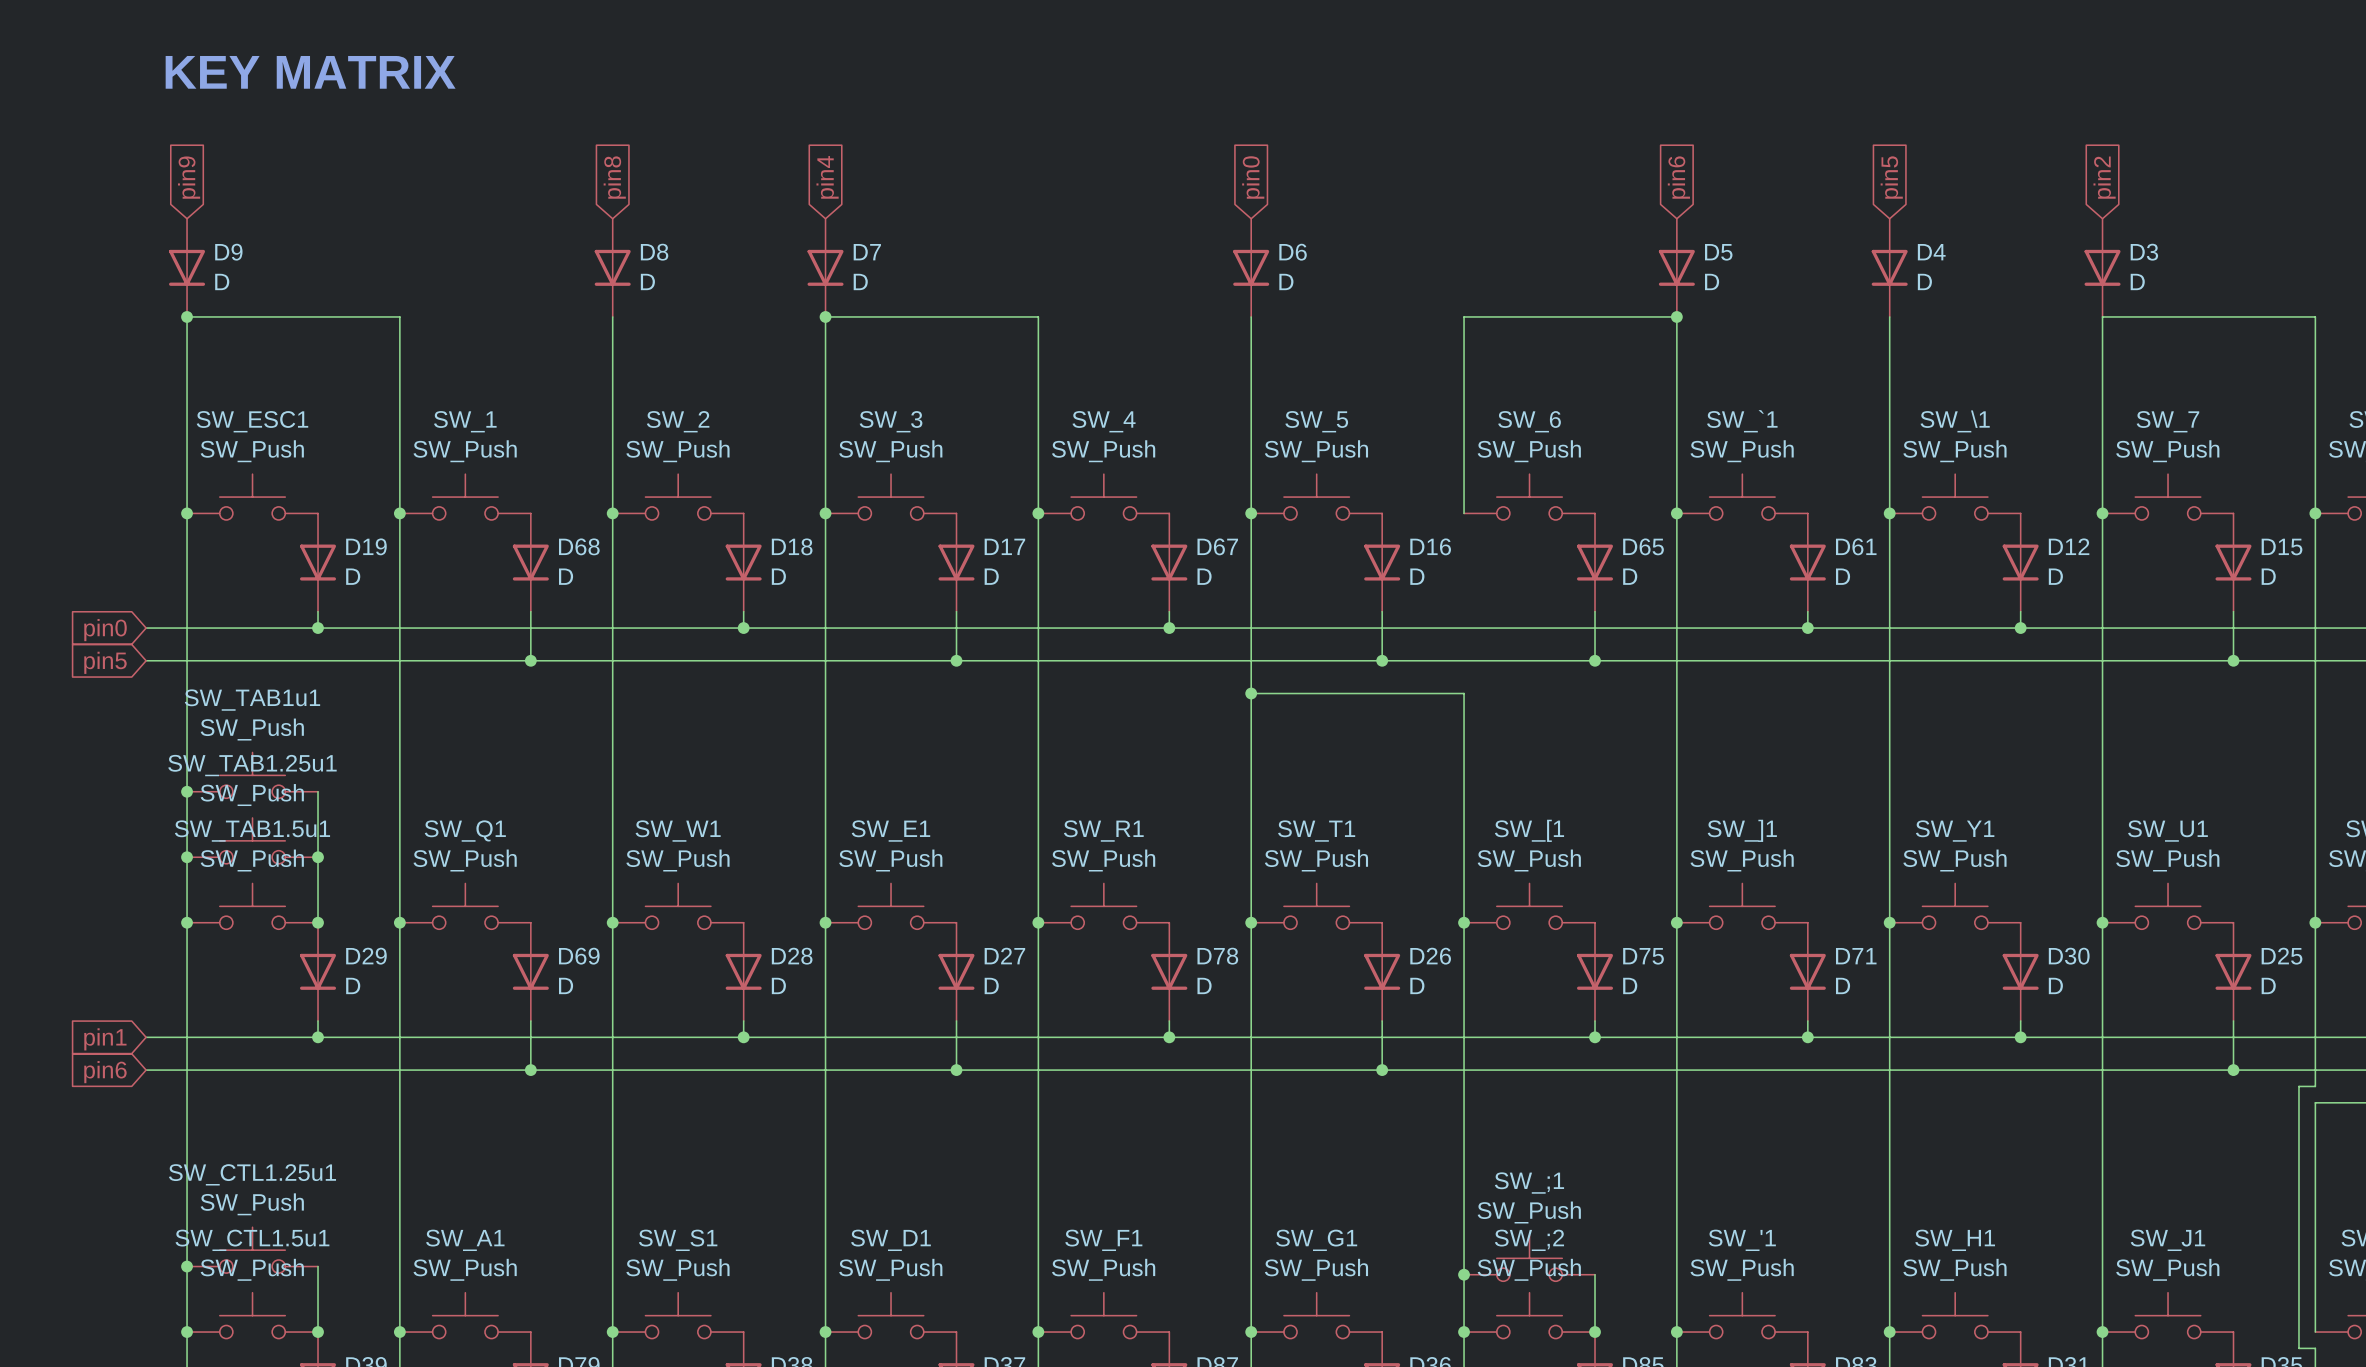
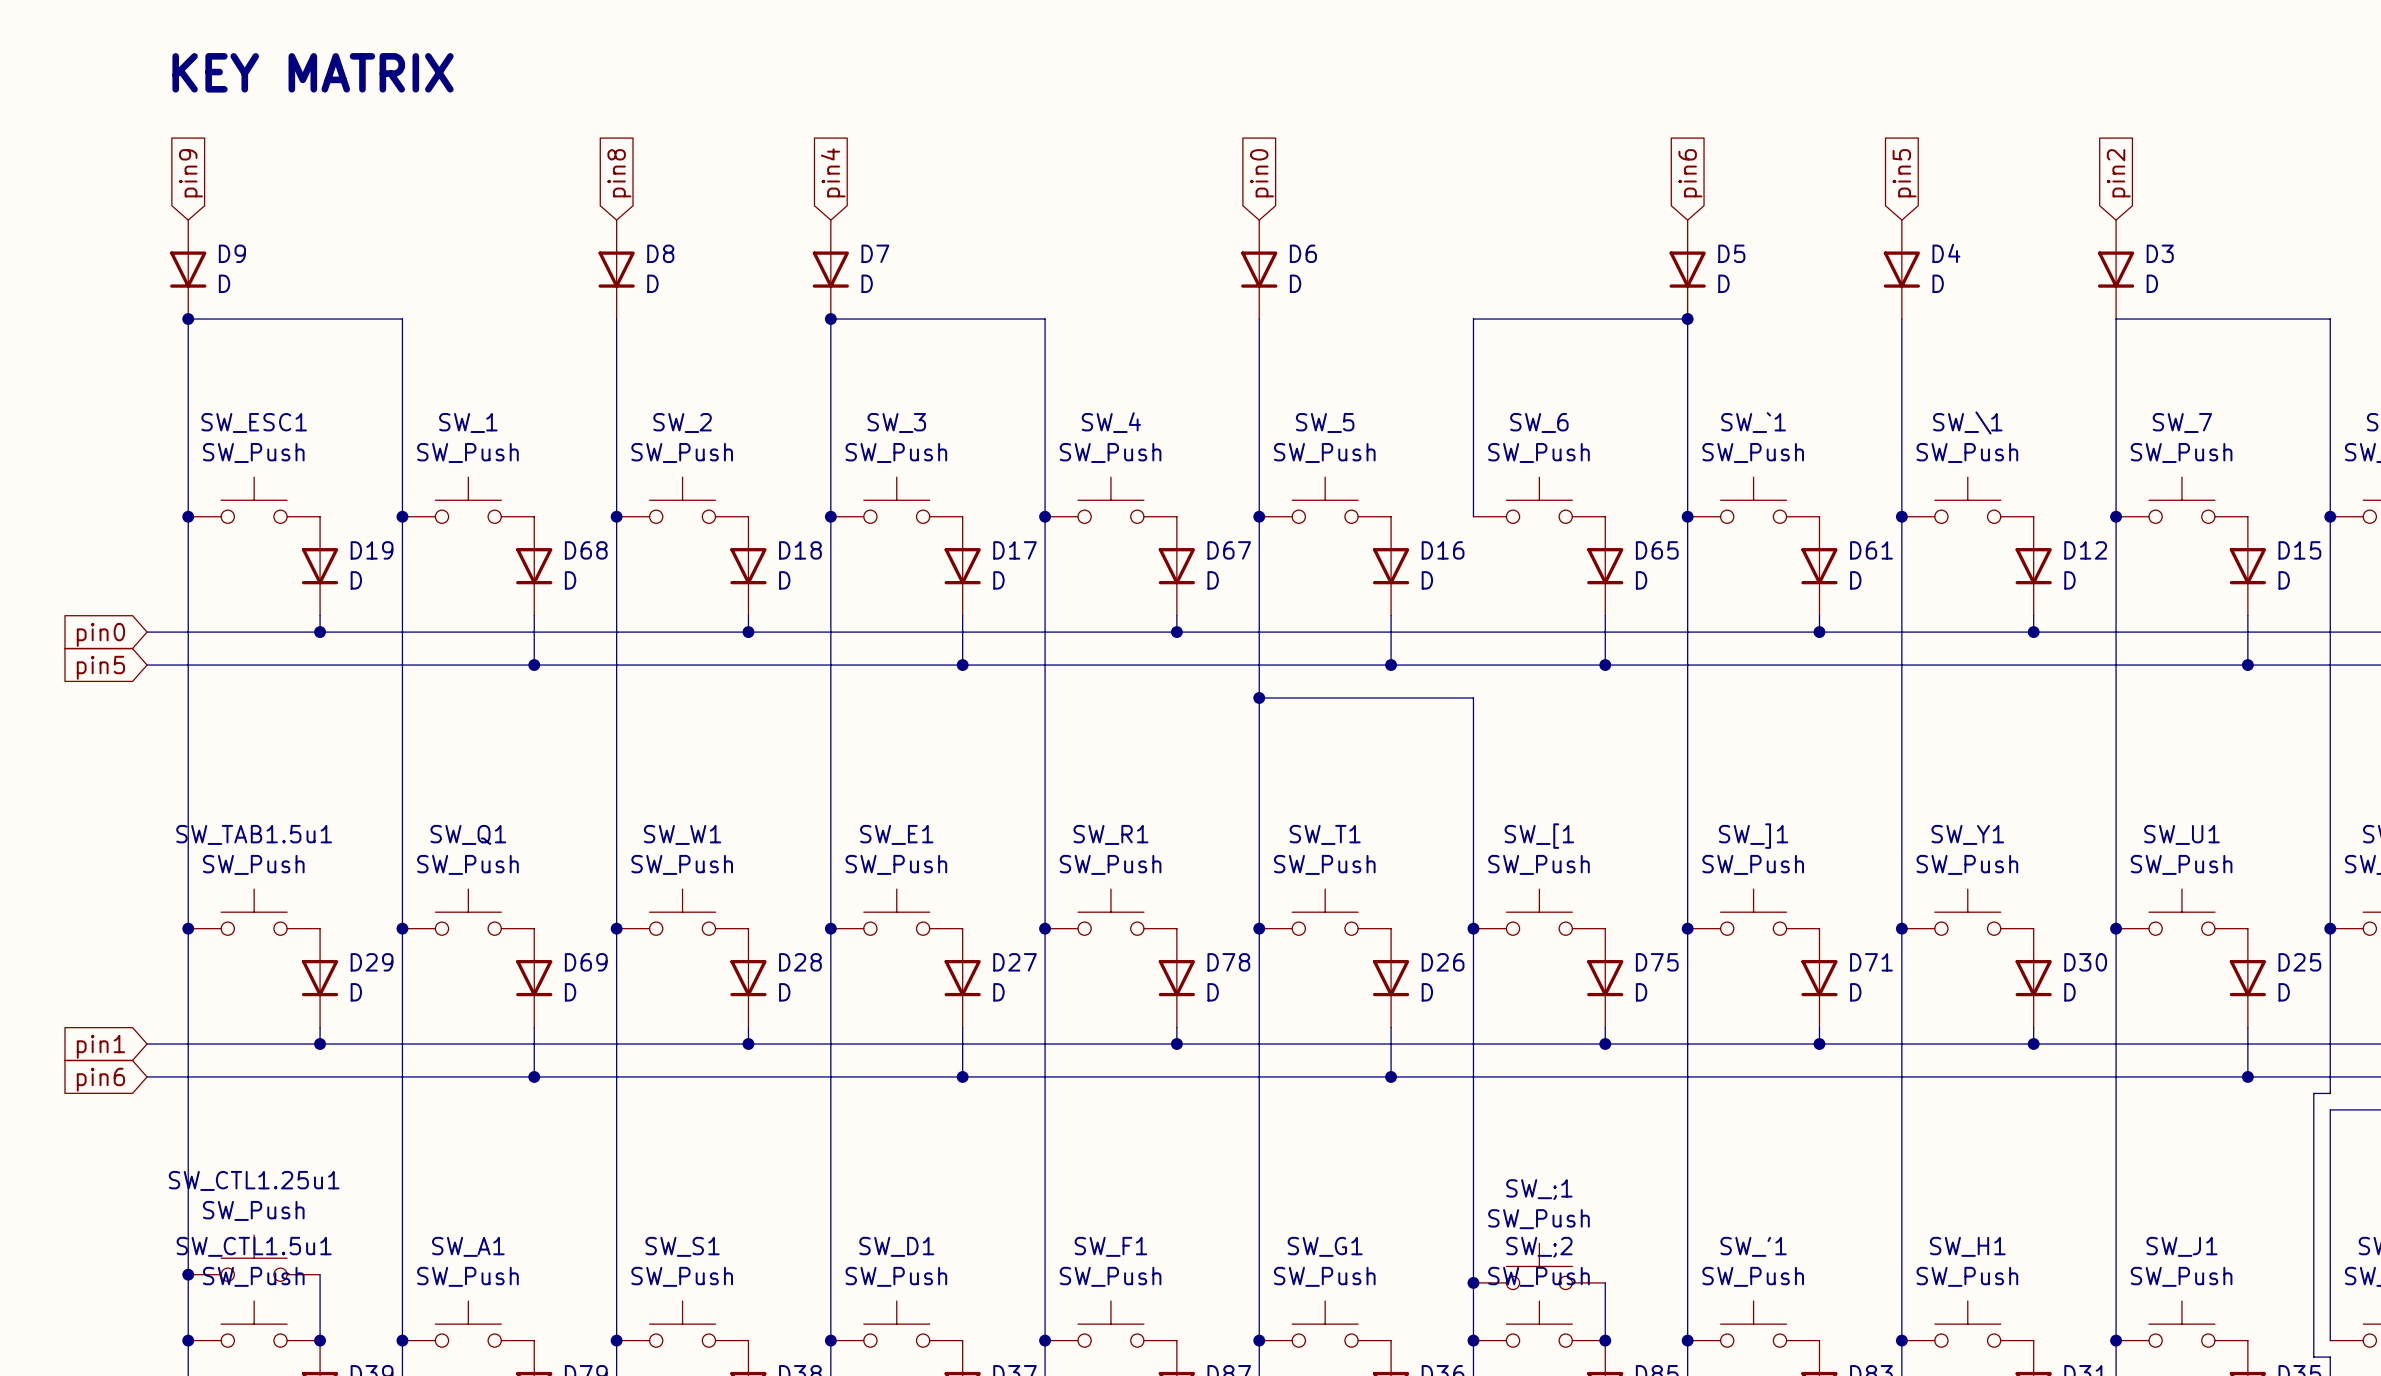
SW_TAB1u1: SW_Push (252, 775) -> none
junction: (187, 791) -> none
wire: (318, 791) (318, 922) -> none
SW_TAB1.25u1: SW_Push (252, 840) -> none
junction: (187, 857) -> none
junction: (318, 857) -> none
junction: (318, 922) -> none

